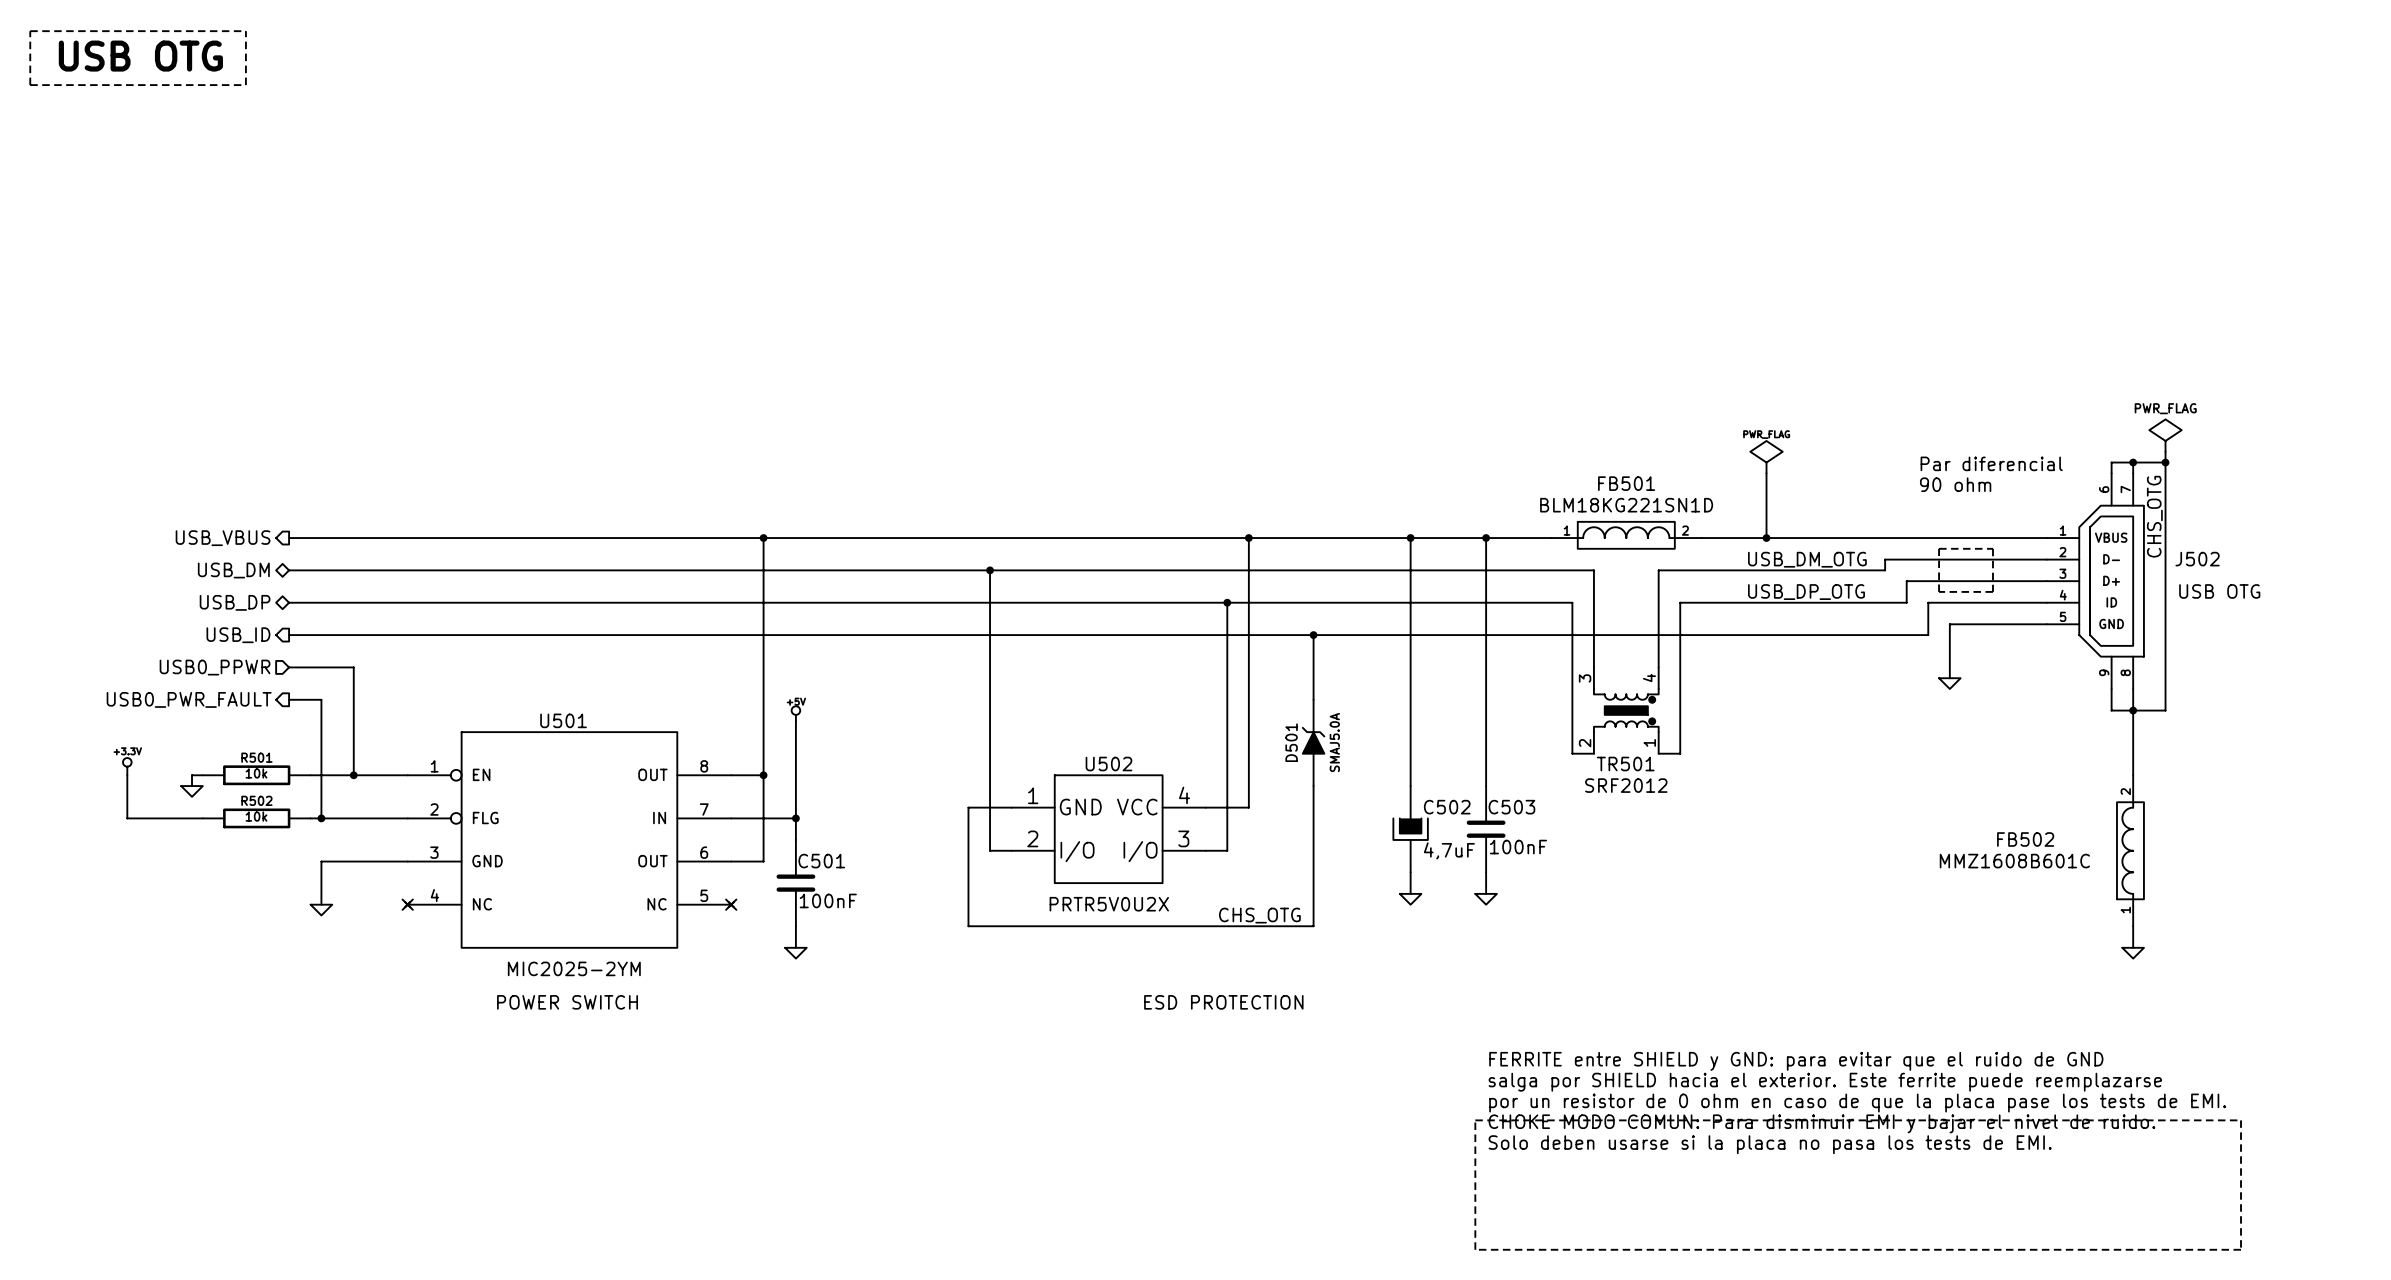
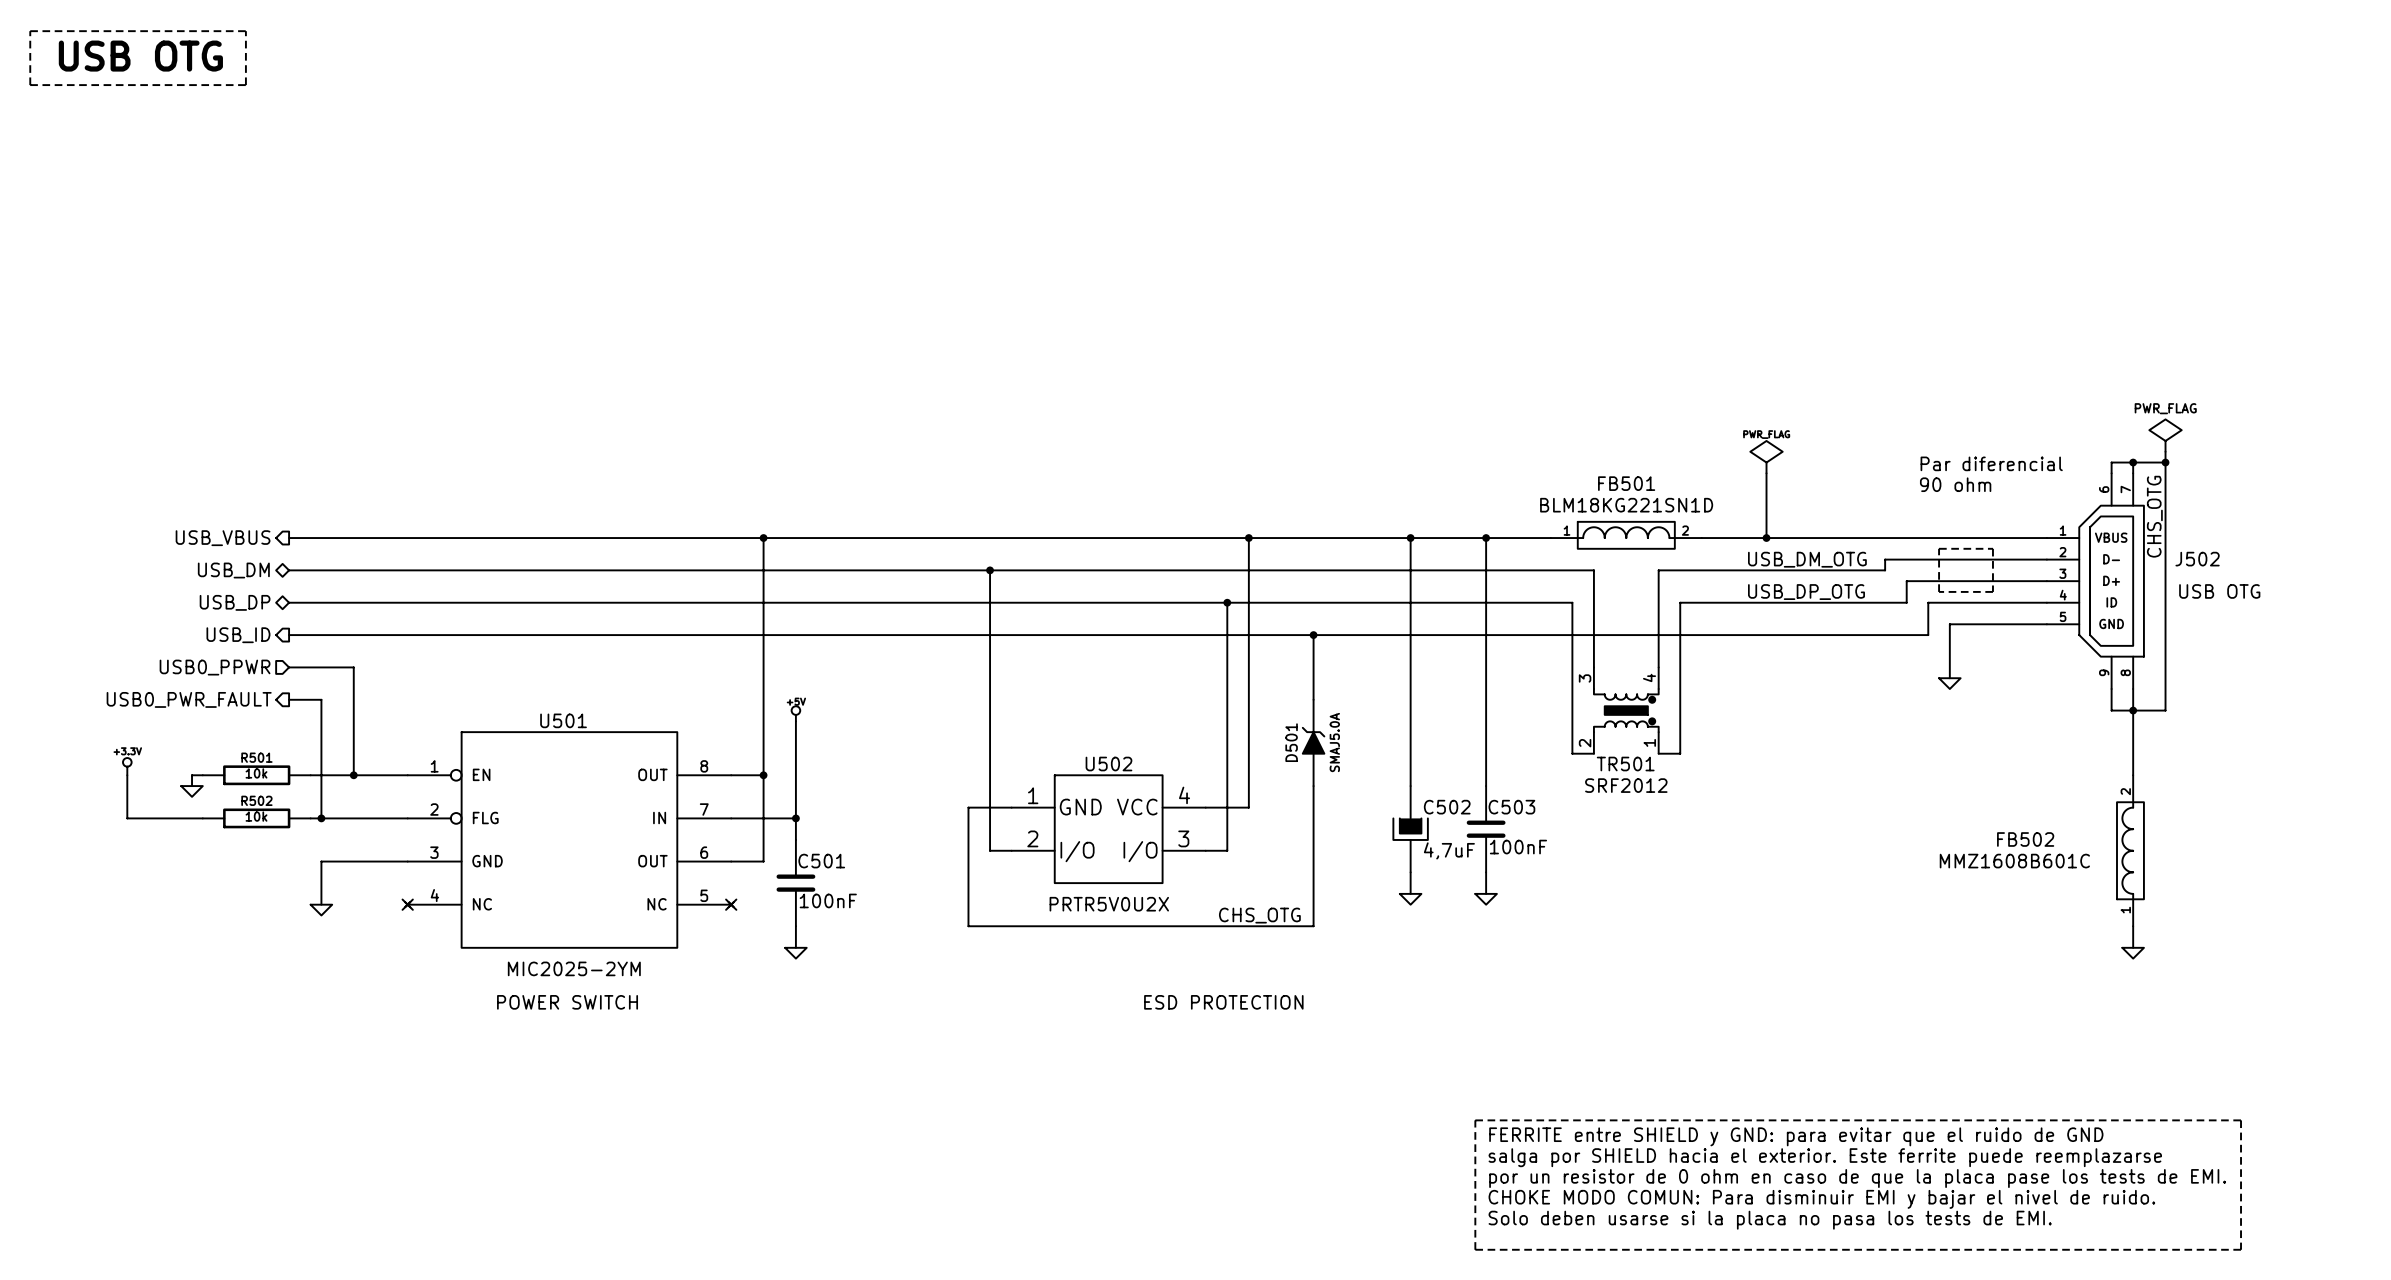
text position: FERRITE entre SHIELD y GND: para evitar que el ruido de GND (1796, 1061) -> FERRITE entre SHIELD y GND: para evitar que el ruido de GND (1796, 1136)
text position: salga por SHIELD hacia el exterior. Este ferrite puede reemplazarse (1825, 1082) -> salga por SHIELD hacia el exterior. Este ferrite puede reemplazarse (1825, 1157)
text position: por un resistor de 0 ohm en caso de que la placa pase los tests de EMI. (1857, 1103) -> por un resistor de 0 ohm en caso de que la placa pase los tests de EMI. (1857, 1178)
text position: CHOKE MODO COMUN: Para disminuir EMI y bajar el nivel de ruido. (1821, 1123) -> CHOKE MODO COMUN: Para disminuir EMI y bajar el nivel de ruido. (1821, 1199)
text position: Solo deben usarse si la placa no pasa los tests de EMI. (1770, 1144) -> Solo deben usarse si la placa no pasa los tests de EMI. (1770, 1220)

